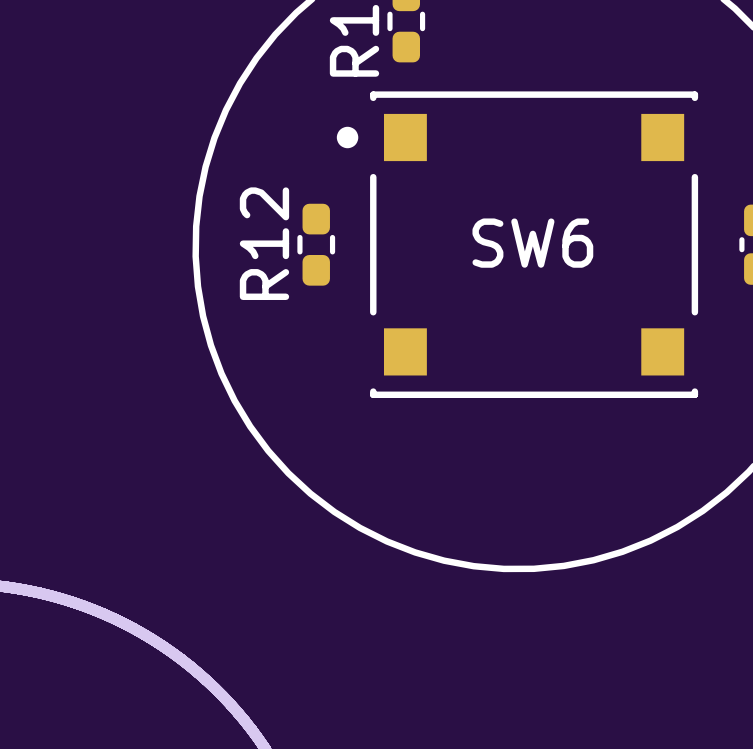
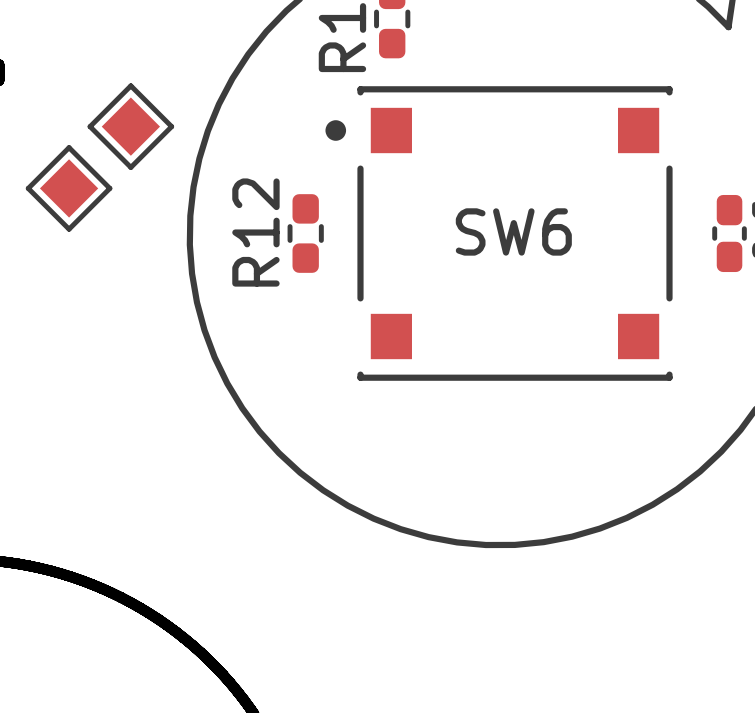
part: none -> (130, 126)
part: none -> (69, 188)

